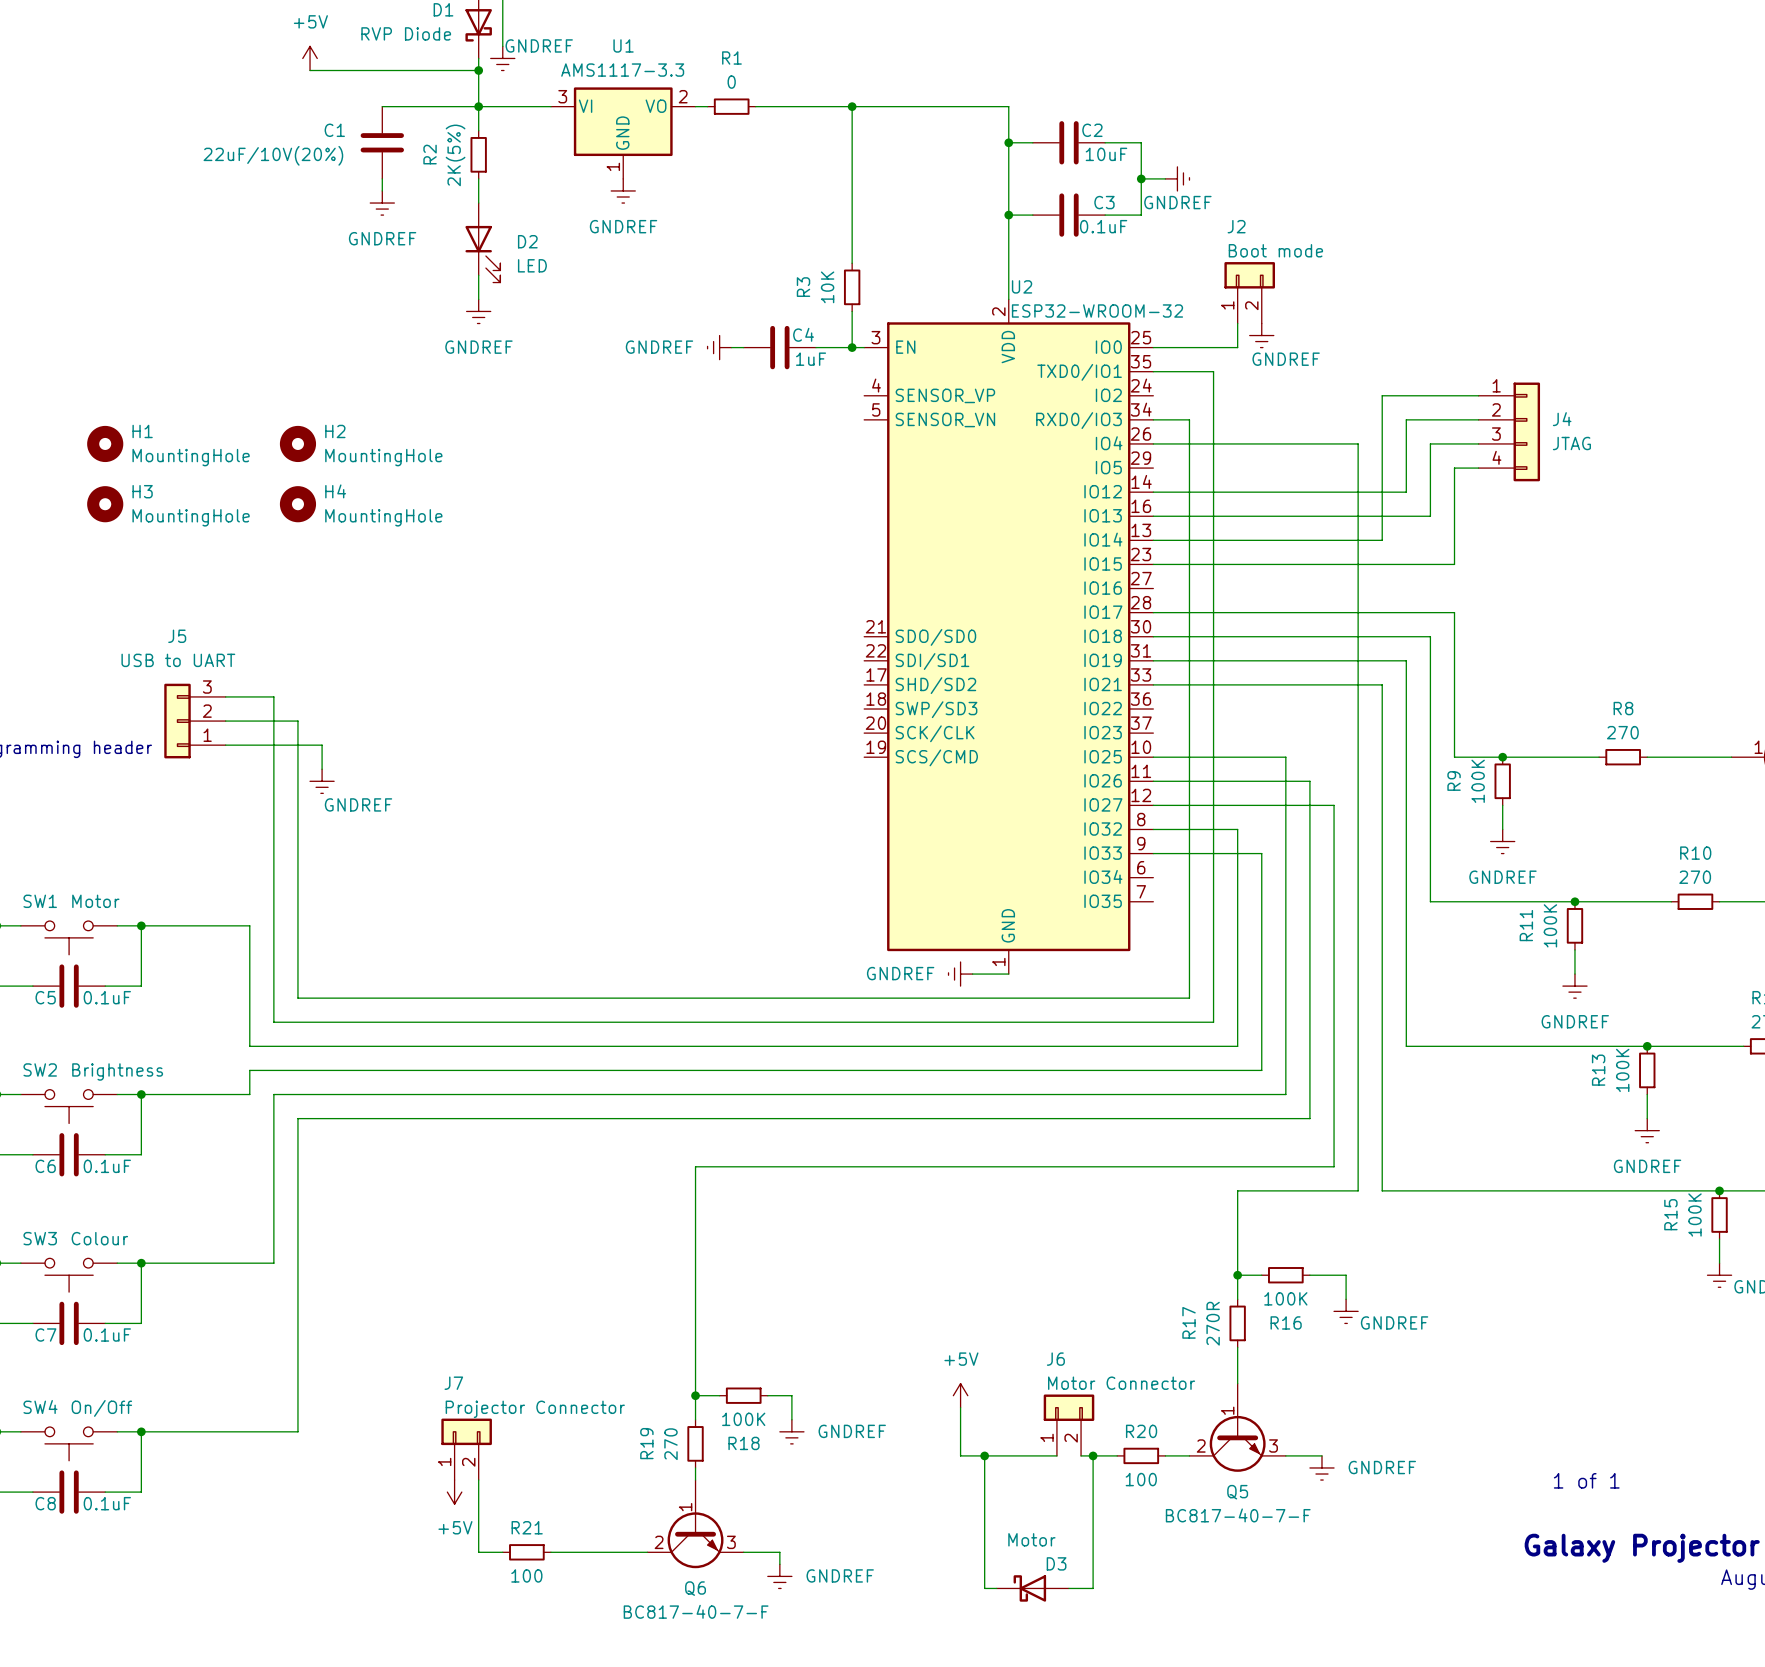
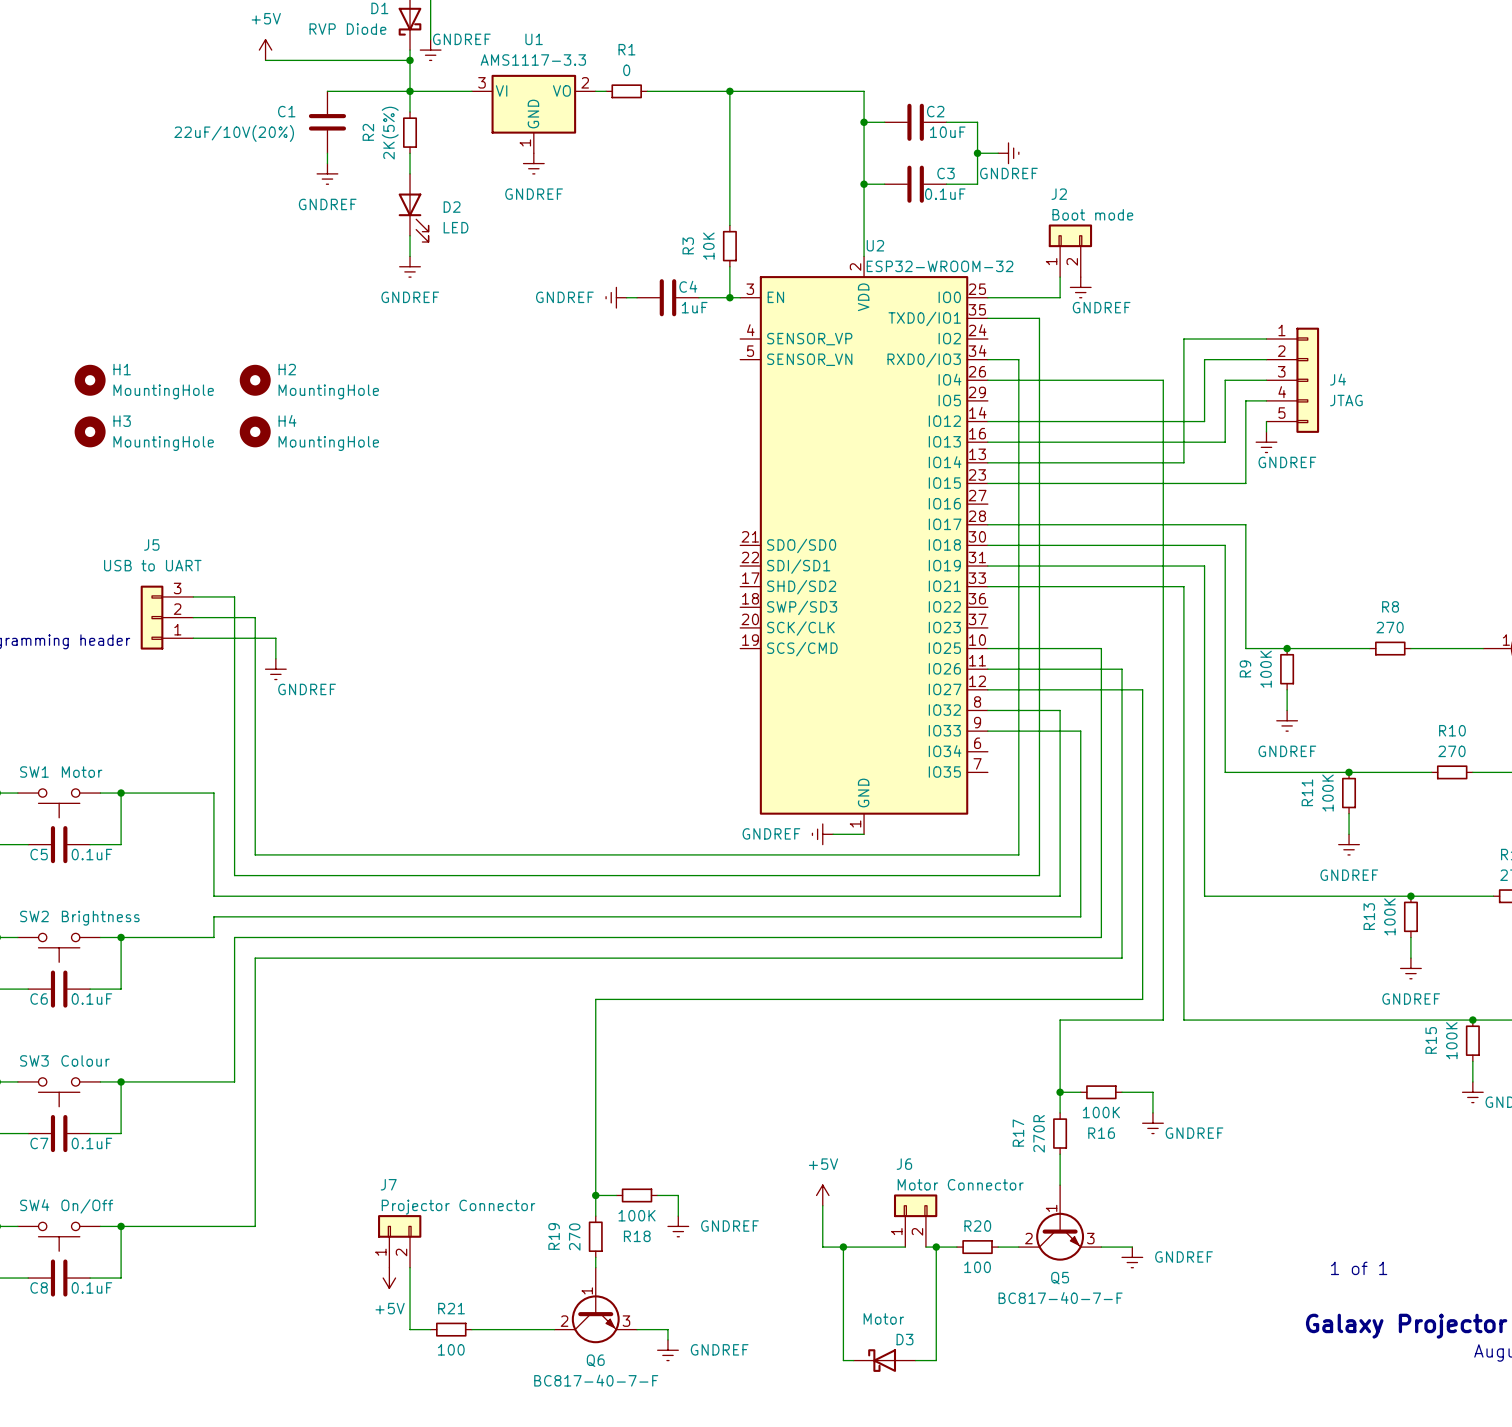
J4 symbol: [1478, 382, 1541, 482] -> [1266, 327, 1320, 433]
wire: none -> (1266, 421) (1266, 431)
power symbol: none -> GNDREF (1266, 442)

